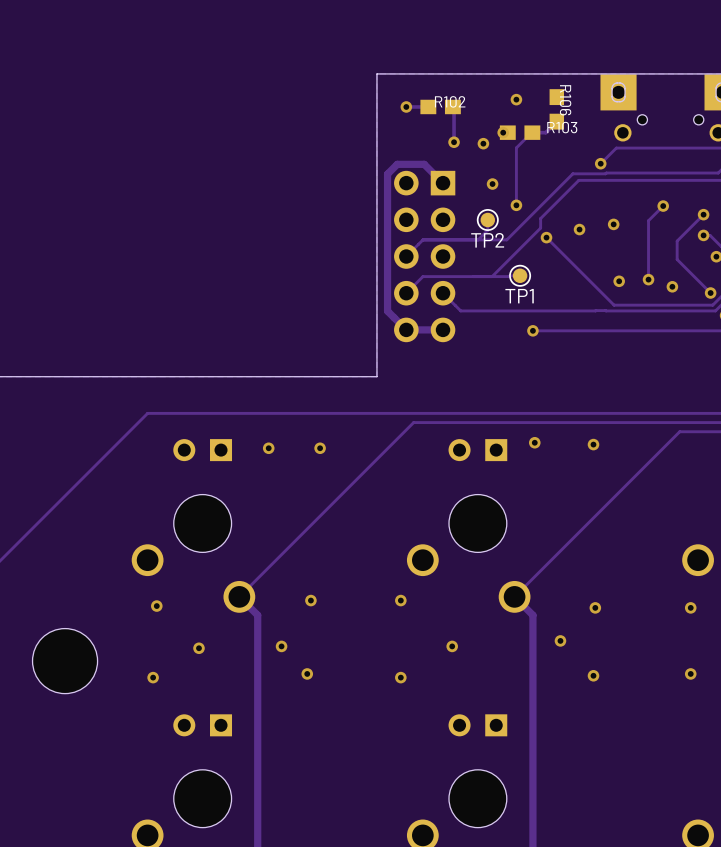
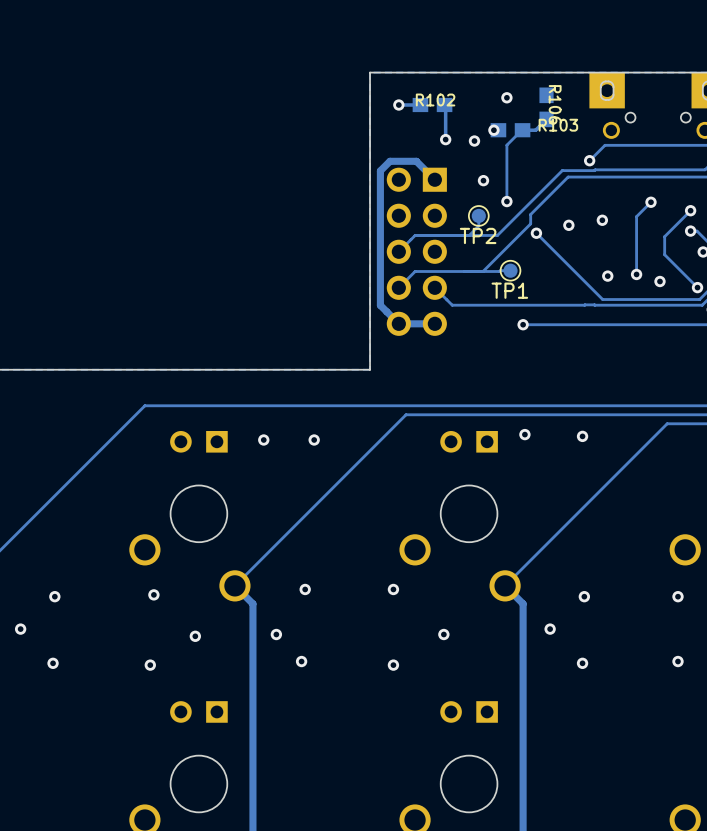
via: none -> (54, 596)
via: none -> (20, 629)
part: (65, 661) -> none
via: none -> (53, 663)

